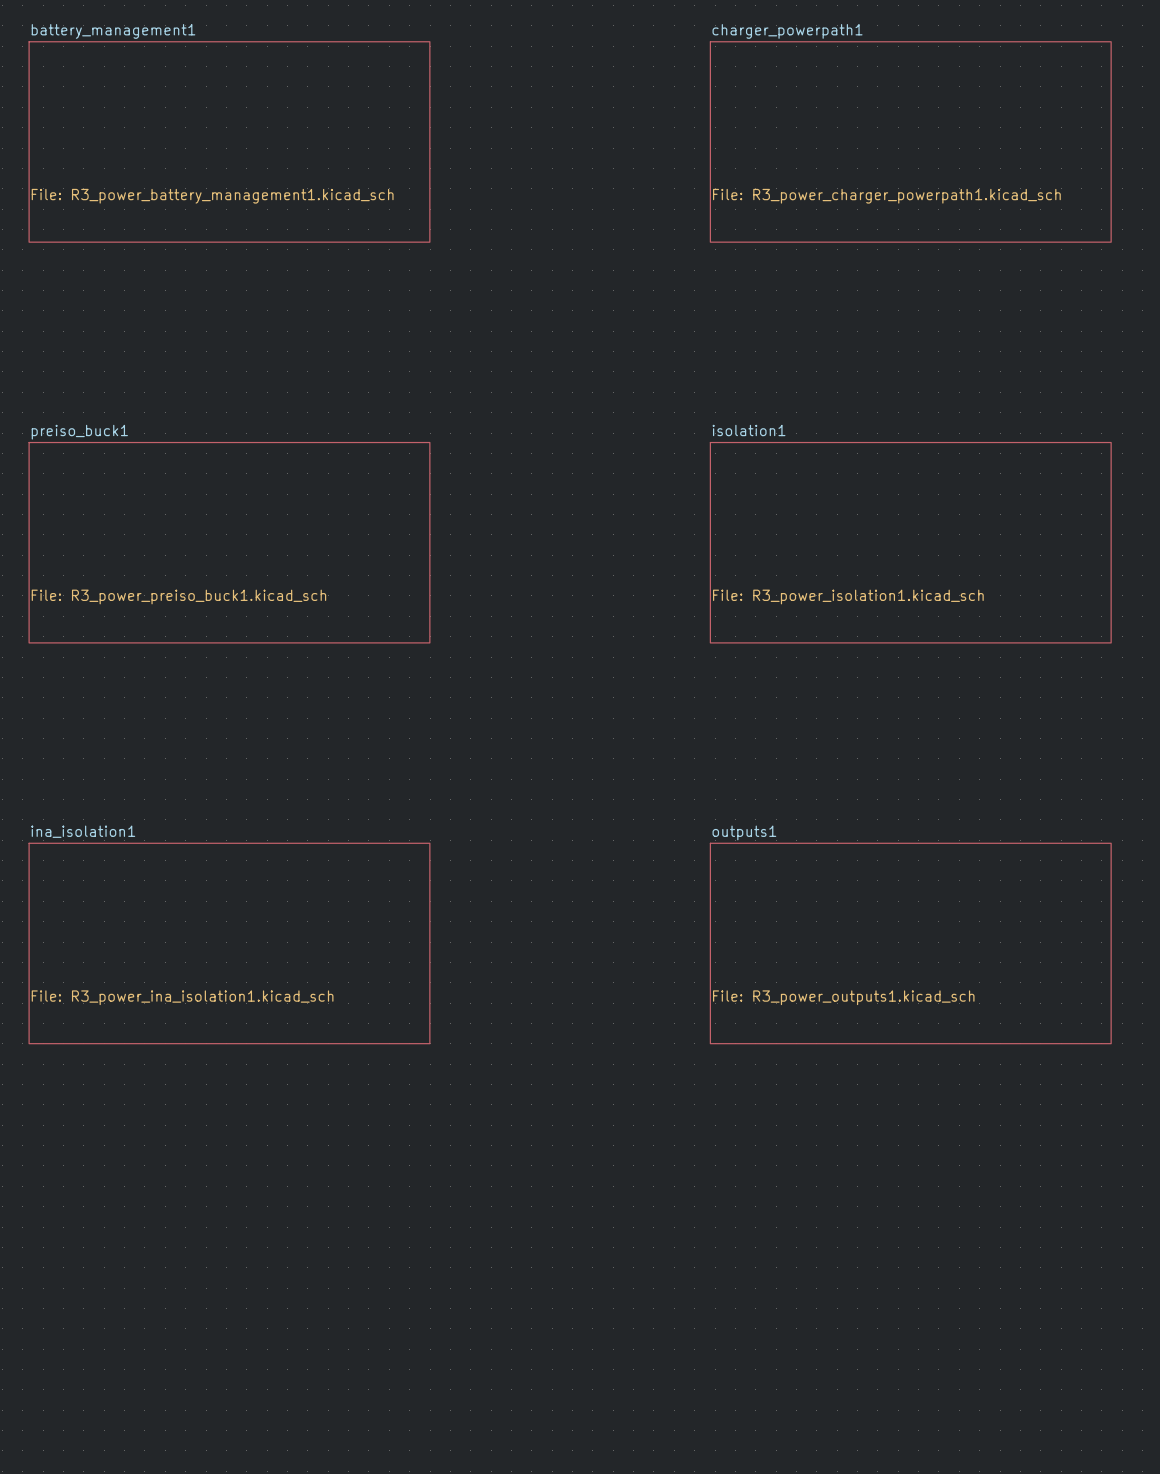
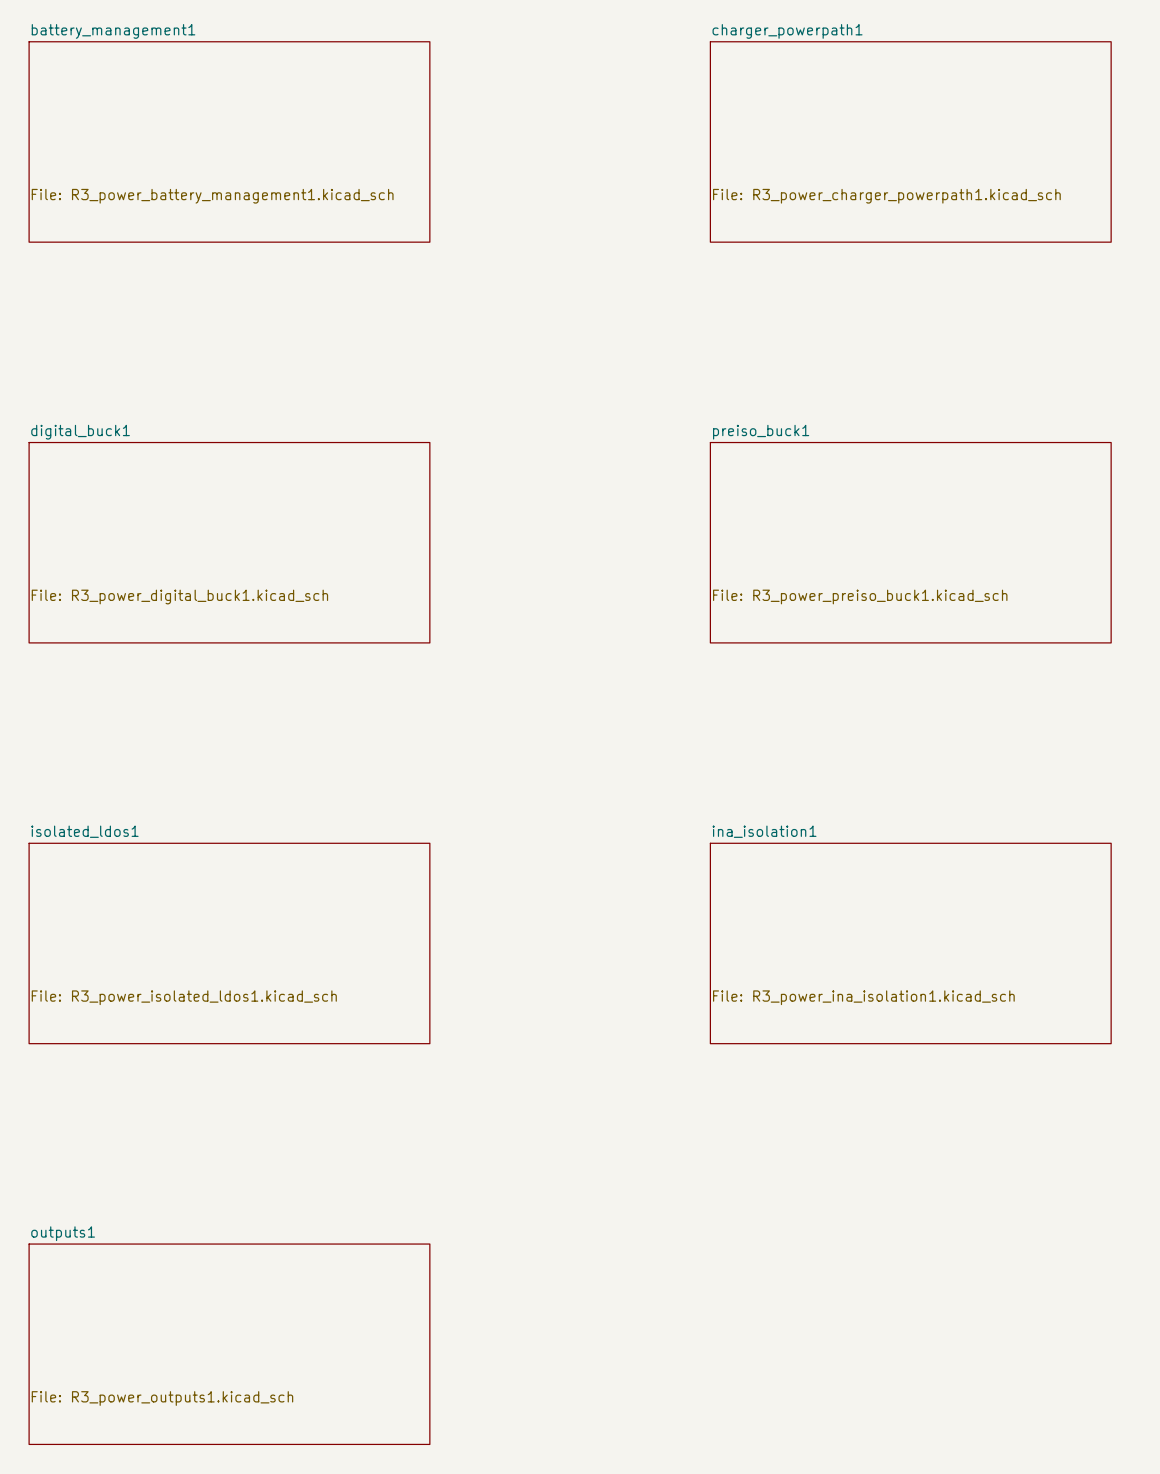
sheet isolation1 name: isolation1 (748, 430) -> preiso_buck1 (761, 432)
sheet preiso_buck1 name: preiso_buck1 (79, 432) -> digital_buck1 (80, 432)
sheet preiso_buck1 value: File: R3_power_preiso_buck1.kicad_sch (178, 597) -> File: R3_power_digital_buck1.kicad_sch (179, 597)
sheet isolation1 value: File: R3_power_isolation1.kicad_sch (848, 597) -> File: R3_power_preiso_buck1.kicad_sch (860, 597)
sheet ina_isolation1 name: ina_isolation1 (83, 831) -> isolated_ldos1 (84, 831)
sheet outputs1 name: outputs1 (744, 832) -> ina_isolation1 (764, 831)
sheet ina_isolation1 value: File: R3_power_ina_isolation1.kicad_sch (182, 997) -> File: R3_power_isolated_ldos1.kicad_sch (184, 997)
sheet outputs1 value: File: R3_power_outputs1.kicad_sch (843, 997) -> File: R3_power_ina_isolation1.kicad_sch (863, 997)
sheet outputs1: none -> File: R3_power_outputs1.kicad_sch (229, 1344)

